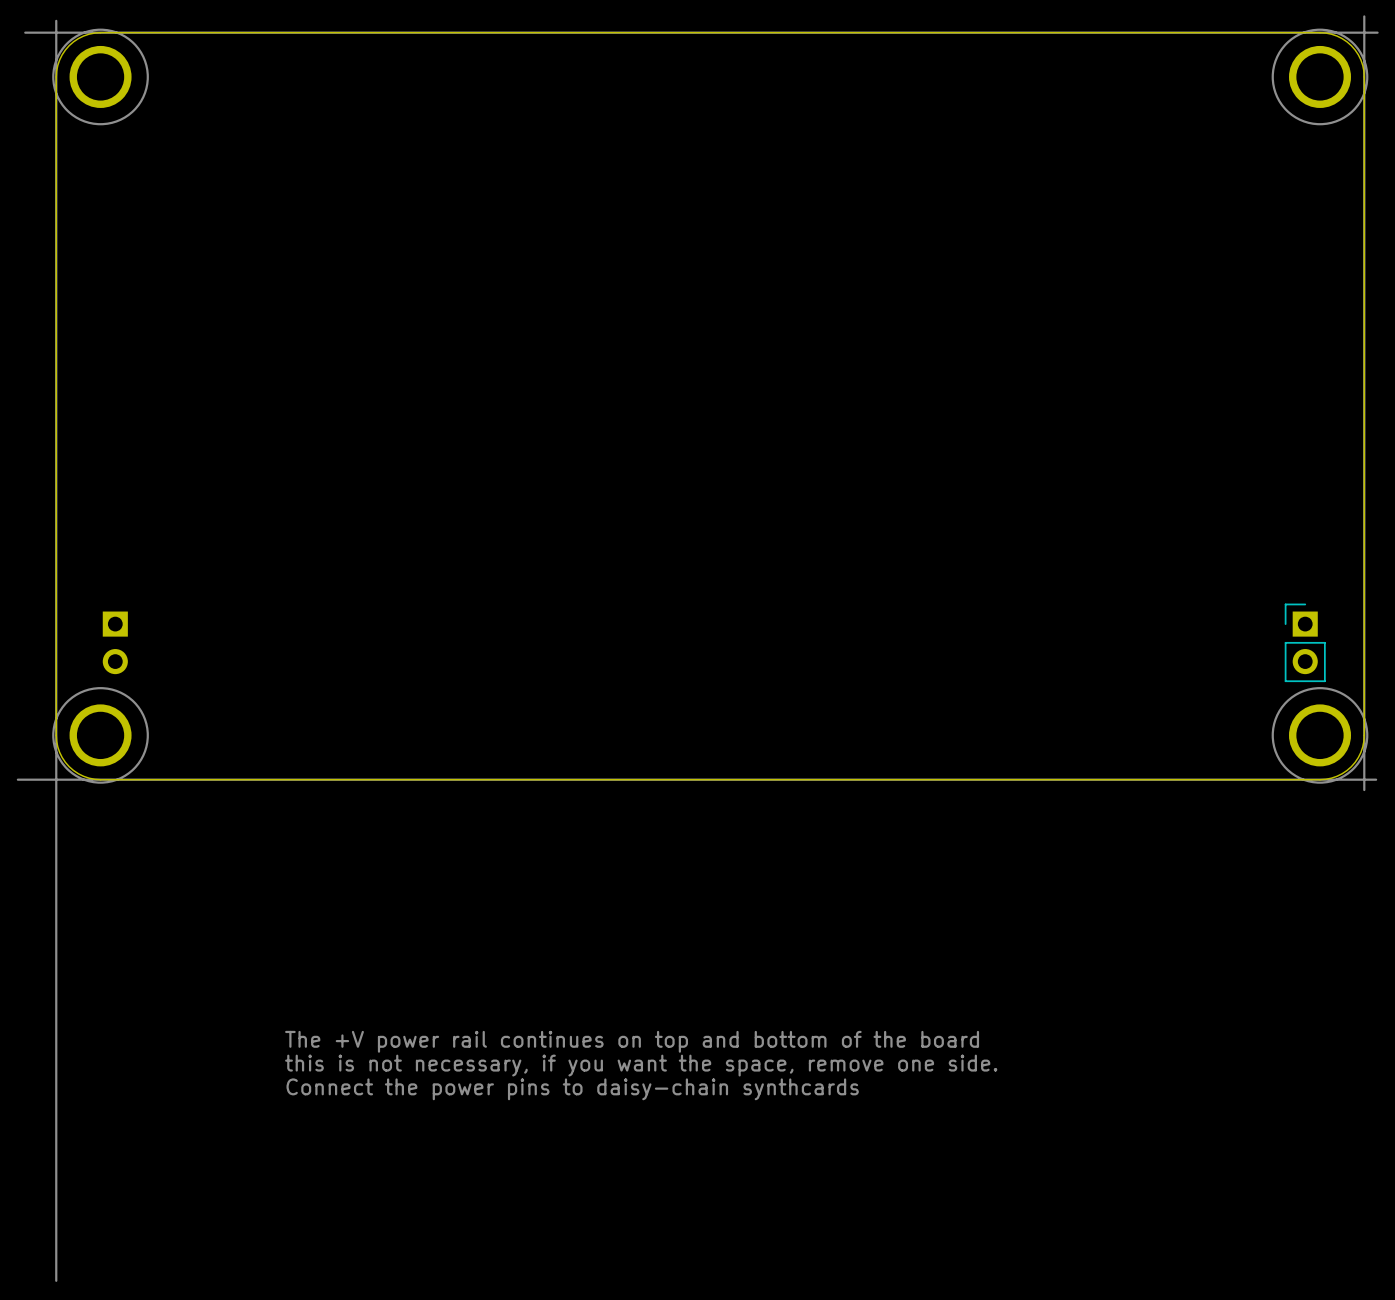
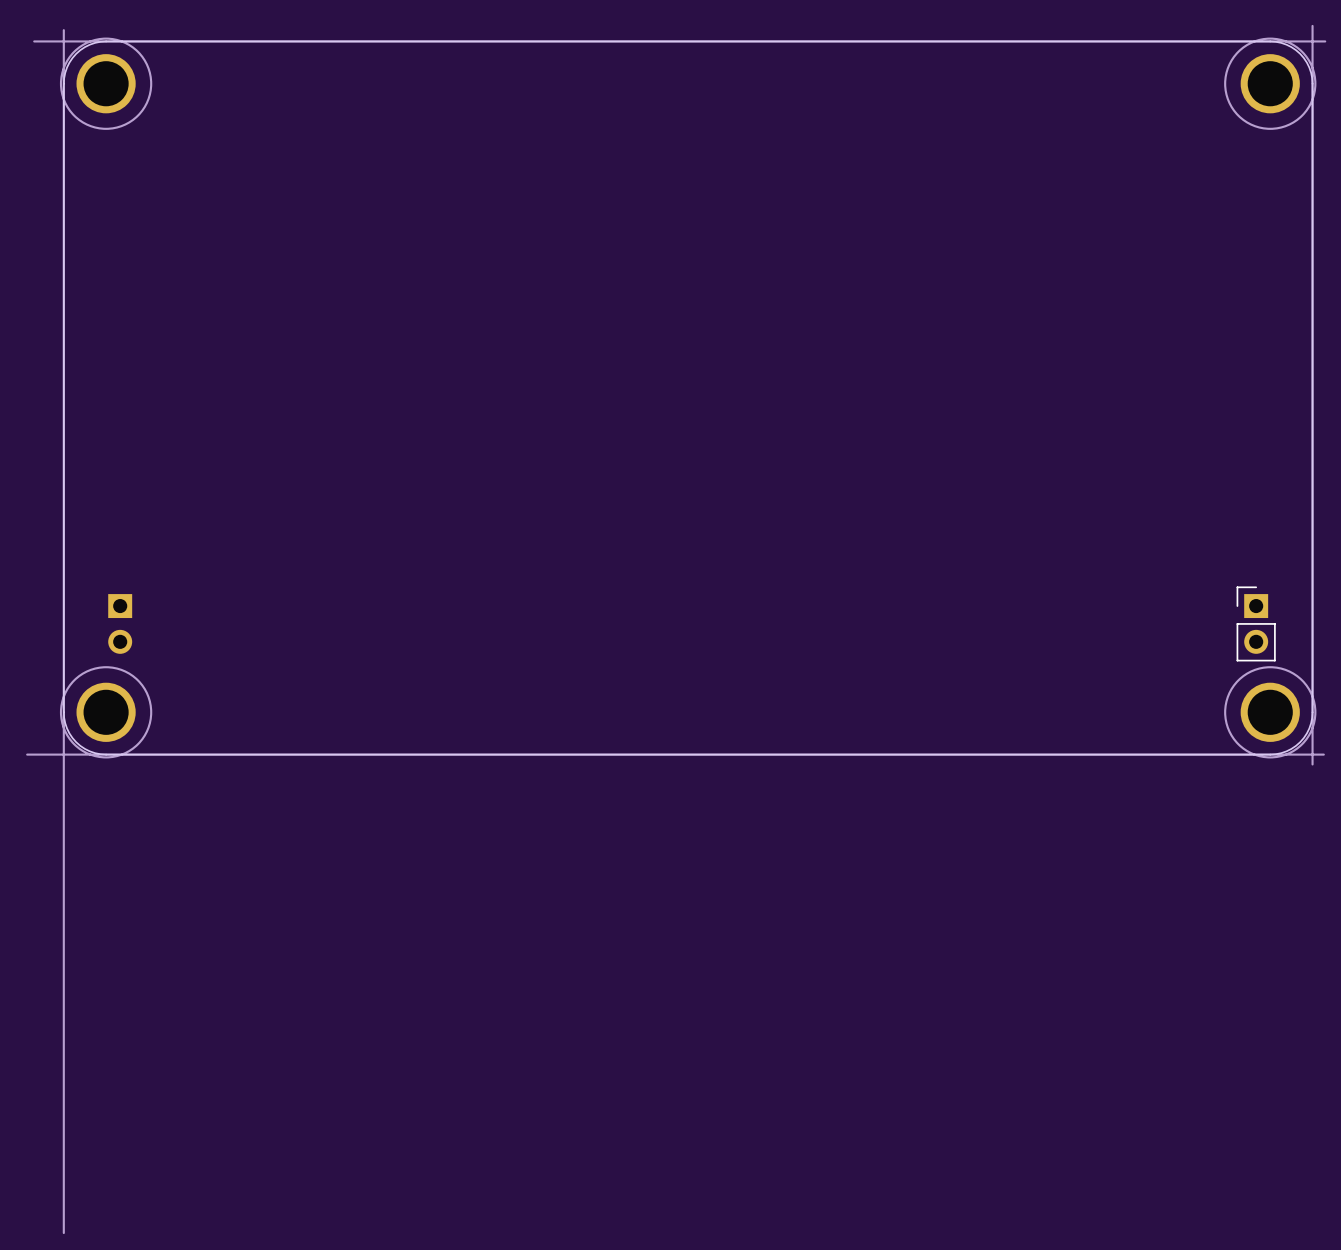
text: The +V power rail continues on top and bottom of the board (632, 1041) -> none
text: this is not necessary, if you want the space, remove one side. (641, 1065) -> none
text: Connect the power pins to daisy-chain synthcards (572, 1089) -> none

